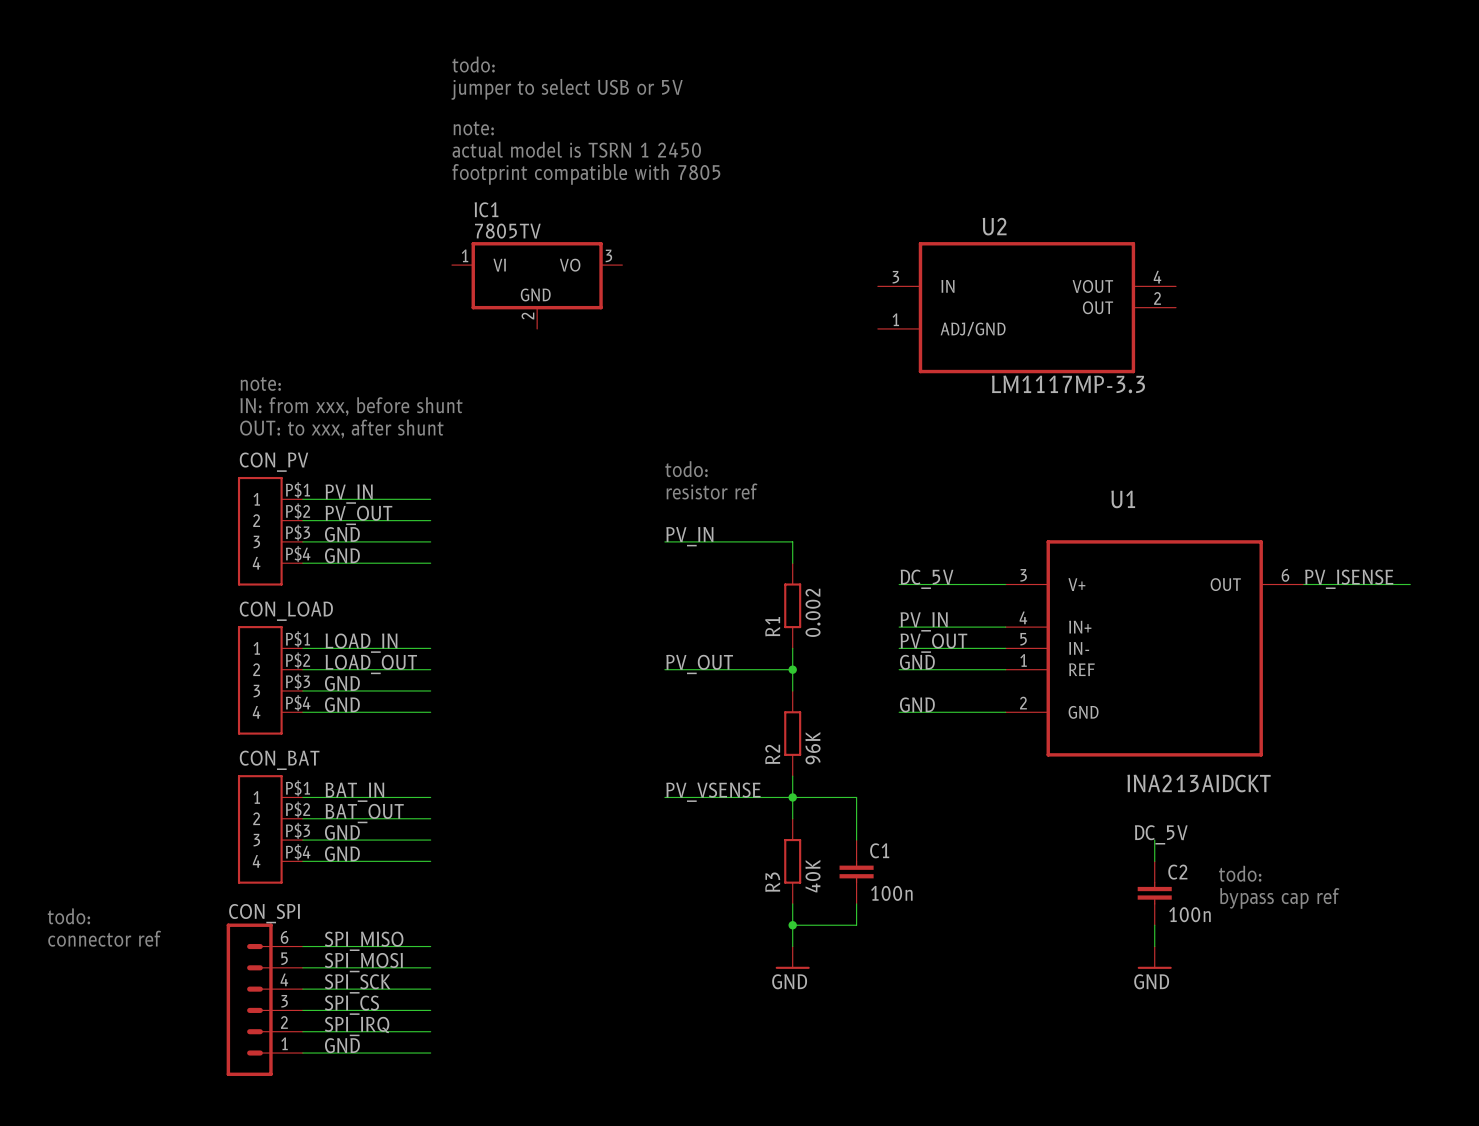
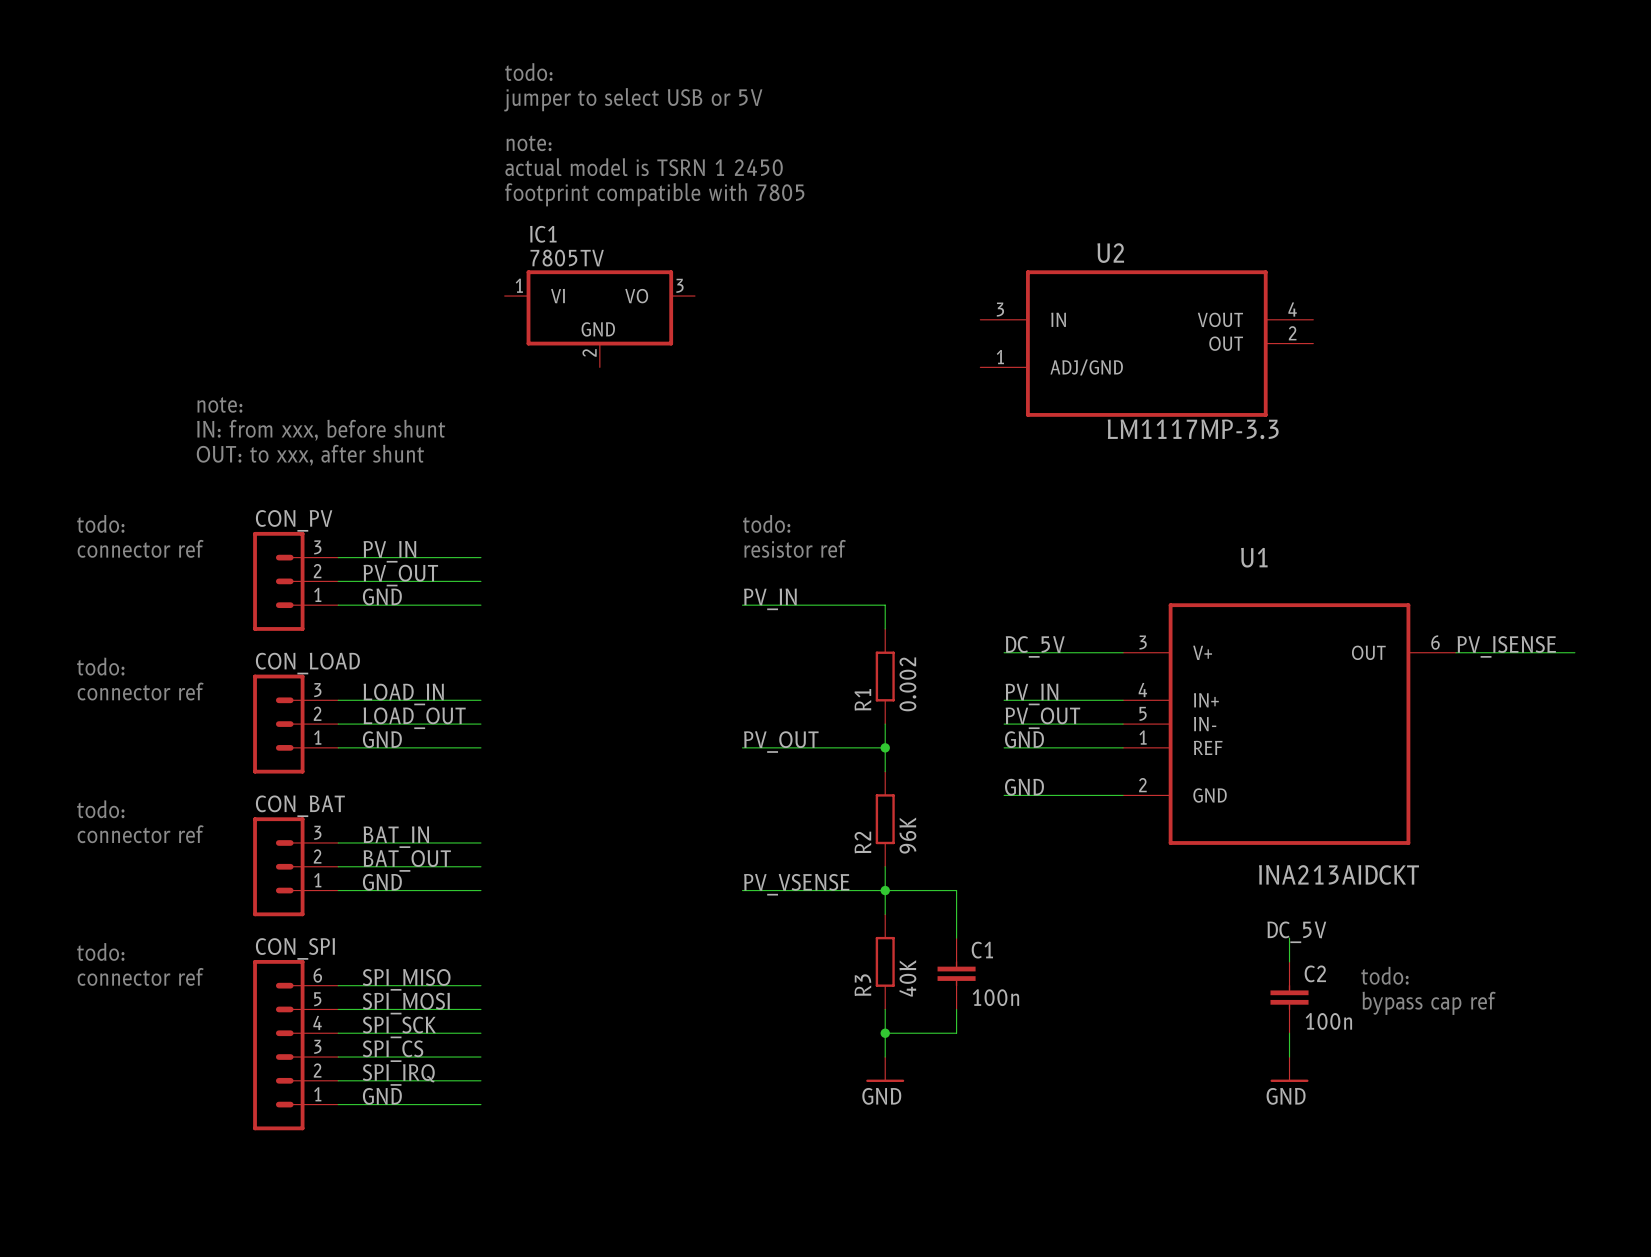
text position: note: (260, 383) -> note: (219, 404)
text position: IN: from xxx, before shunt (351, 406) -> IN: from xxx, before shunt (321, 430)
text position: OUT: to xxx, after shunt (341, 428) -> OUT: to xxx, after shunt (310, 455)
text: none -> todo: (100, 523)
text: none -> connector ref (140, 548)
CON_PV: none -> (295, 581)
CON_PV: (270, 531) -> none
label: GND (342, 555) -> none
wire: (302, 563) (430, 563) -> (338, 700) (480, 700)
text: none -> todo: (100, 666)
text: none -> connector ref (140, 691)
label: none -> LOAD_IN (403, 694)
label: LOAD_IN (361, 643) -> LOAD_OUT (414, 718)
CON_LOAD: none -> (295, 724)
label: LOAD_OUT (371, 664) -> GND (382, 739)
CON_LOAD: (270, 680) -> none
label: GND (342, 683) -> none
wire: (302, 690) (430, 690) -> (338, 842) (480, 842)
label: GND (342, 704) -> none
wire: (302, 712) (430, 712) -> (338, 866) (480, 866)
text: none -> todo: (100, 809)
text: none -> connector ref (140, 834)
label: none -> BAT_IN (396, 837)
CON_BAT: none -> (295, 866)
label: BAT_IN (354, 792) -> GND (382, 882)
label position: BAT_OUT (364, 813) -> BAT_OUT (407, 860)
wire: (302, 818) (430, 818) -> (338, 985) (480, 985)
CON_BAT: (270, 829) -> none
label: GND (342, 832) -> none
wire: (302, 840) (430, 840) -> (338, 1009) (480, 1009)
label: GND (342, 853) -> none
wire: (302, 861) (430, 861) -> (338, 1033) (480, 1033)
label: none -> SPI_MISO (406, 979)
label: none -> SPI_MOSI (406, 1003)
text position: todo: (68, 916) -> todo: (100, 951)
label: none -> SPI_SCK (399, 1027)
text position: connector ref (104, 938) -> connector ref (140, 976)
label: SPI_MISO (364, 941) -> SPI_CS (393, 1051)
label: SPI_MOSI (363, 962) -> SPI_IRQ (398, 1074)
label: SPI_SCK (357, 983) -> GND (382, 1096)
CON_SPI position: (264, 999) -> (295, 1045)
label: SPI_CS (351, 1005) -> none
wire: (302, 1010) (430, 1010) -> none
label: SPI_IRQ (357, 1026) -> none
wire: (302, 1031) (430, 1031) -> none
label: GND (342, 1045) -> none
wire: (302, 1053) (430, 1053) -> none

